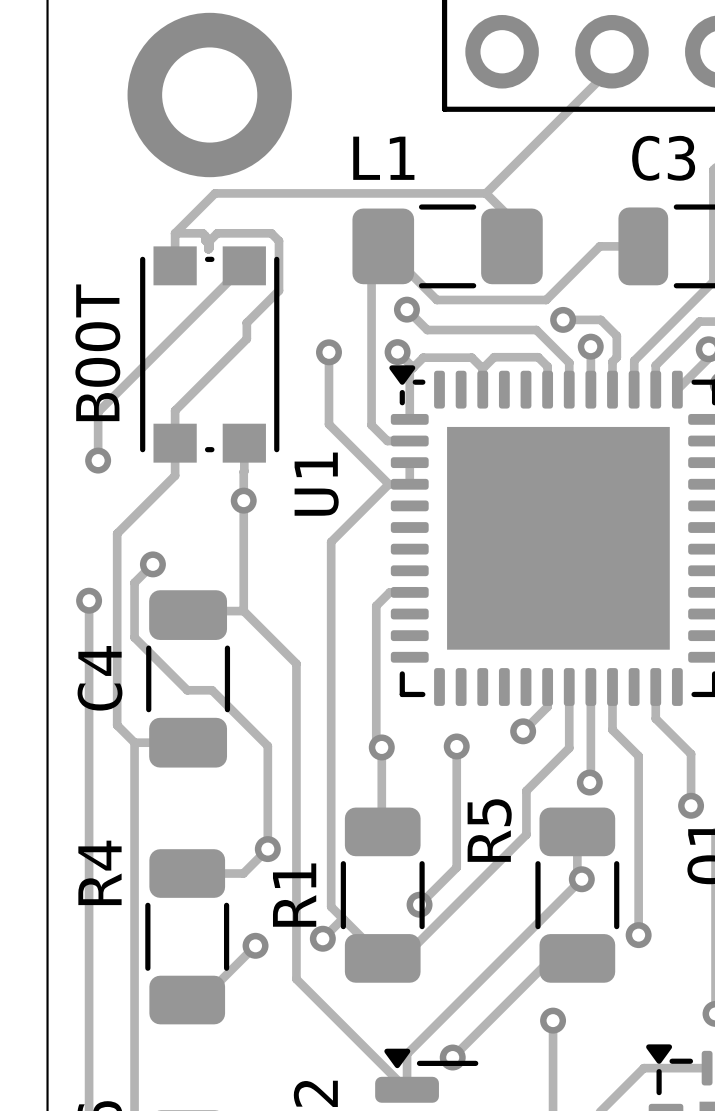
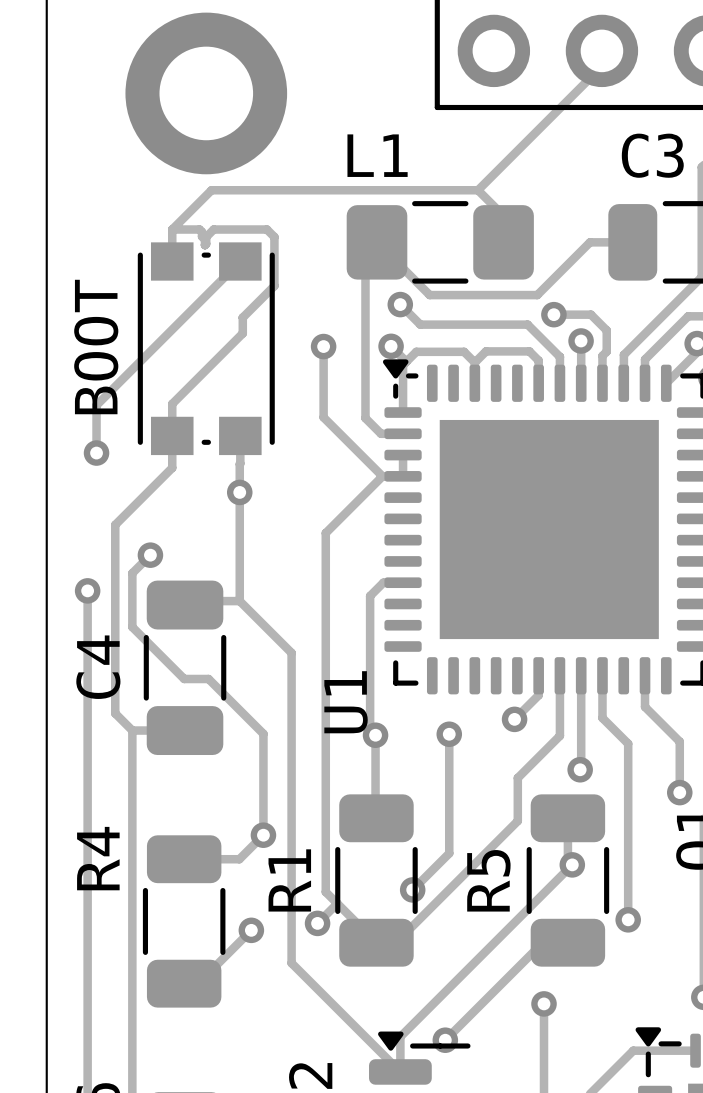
U1 name position: U1 (316, 484) -> U1 (346, 702)
R5 name position: R5 (489, 830) -> R5 (488, 880)

